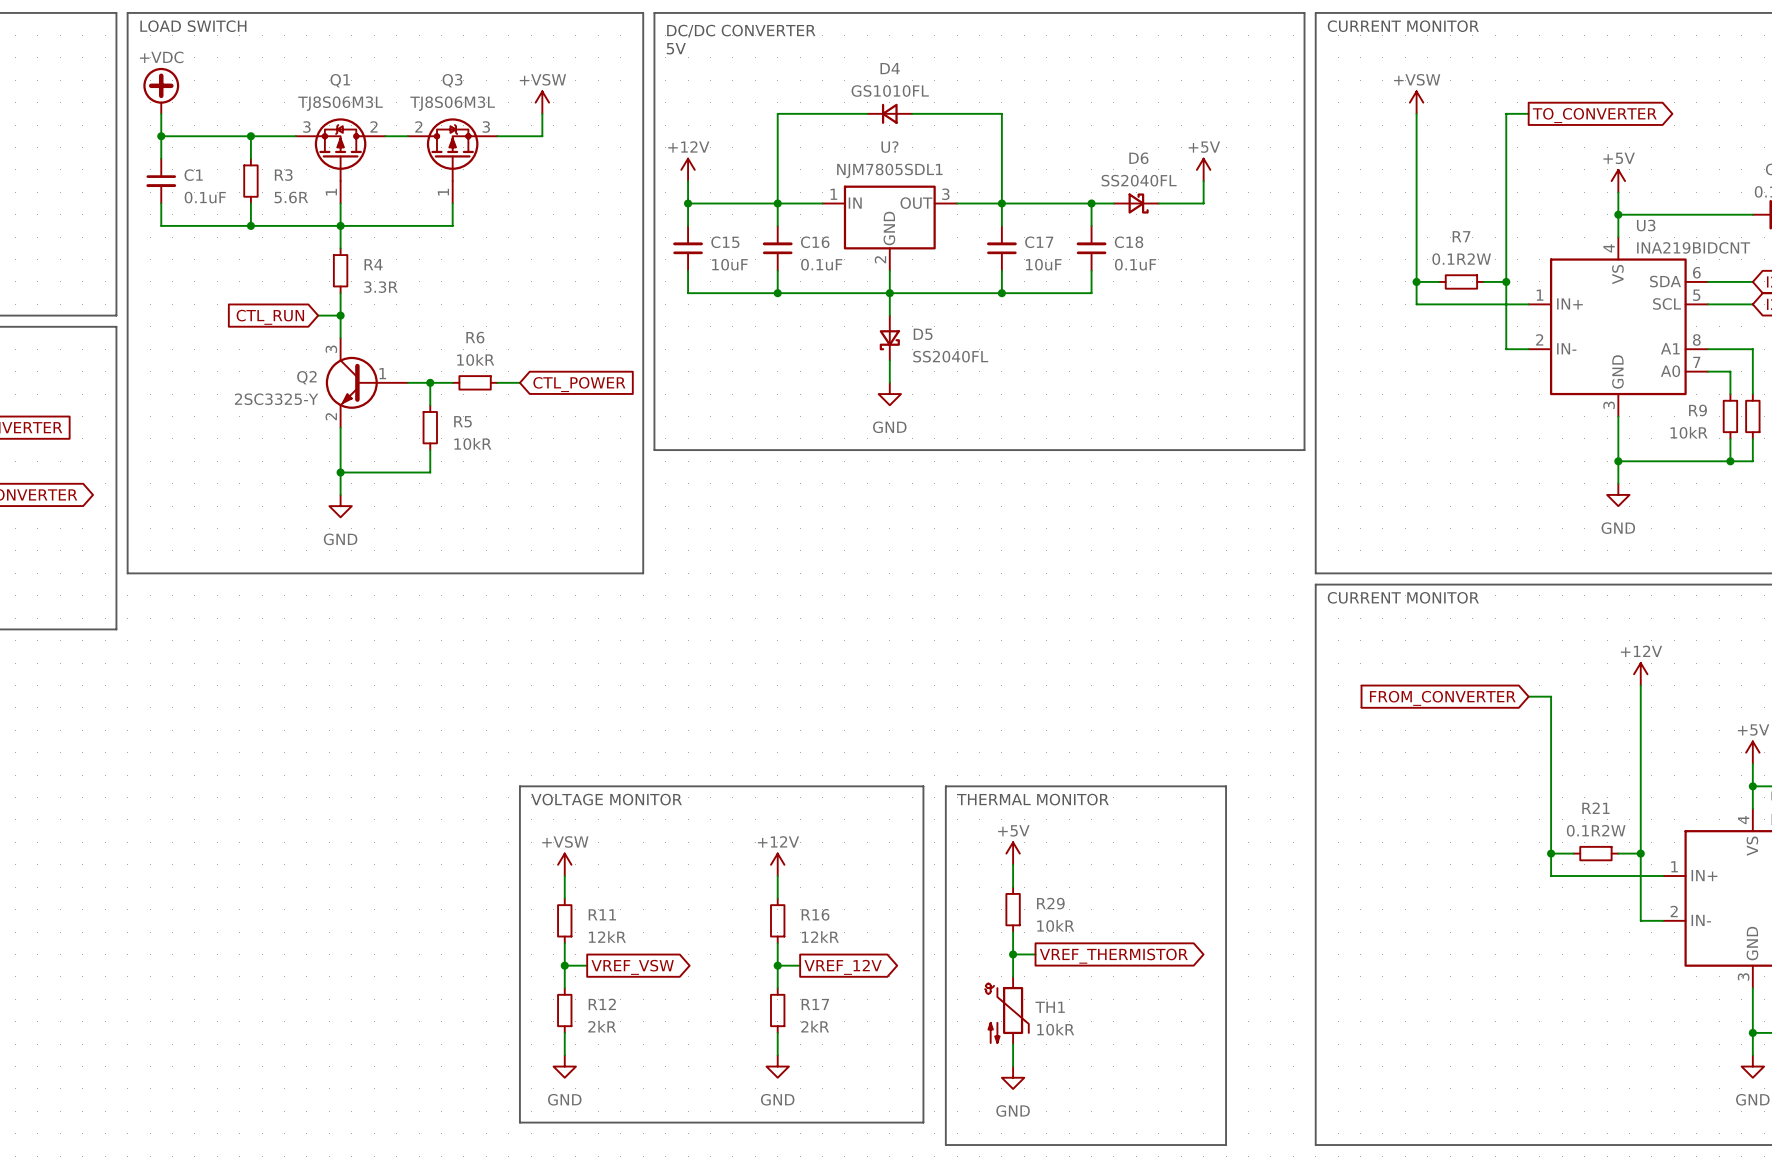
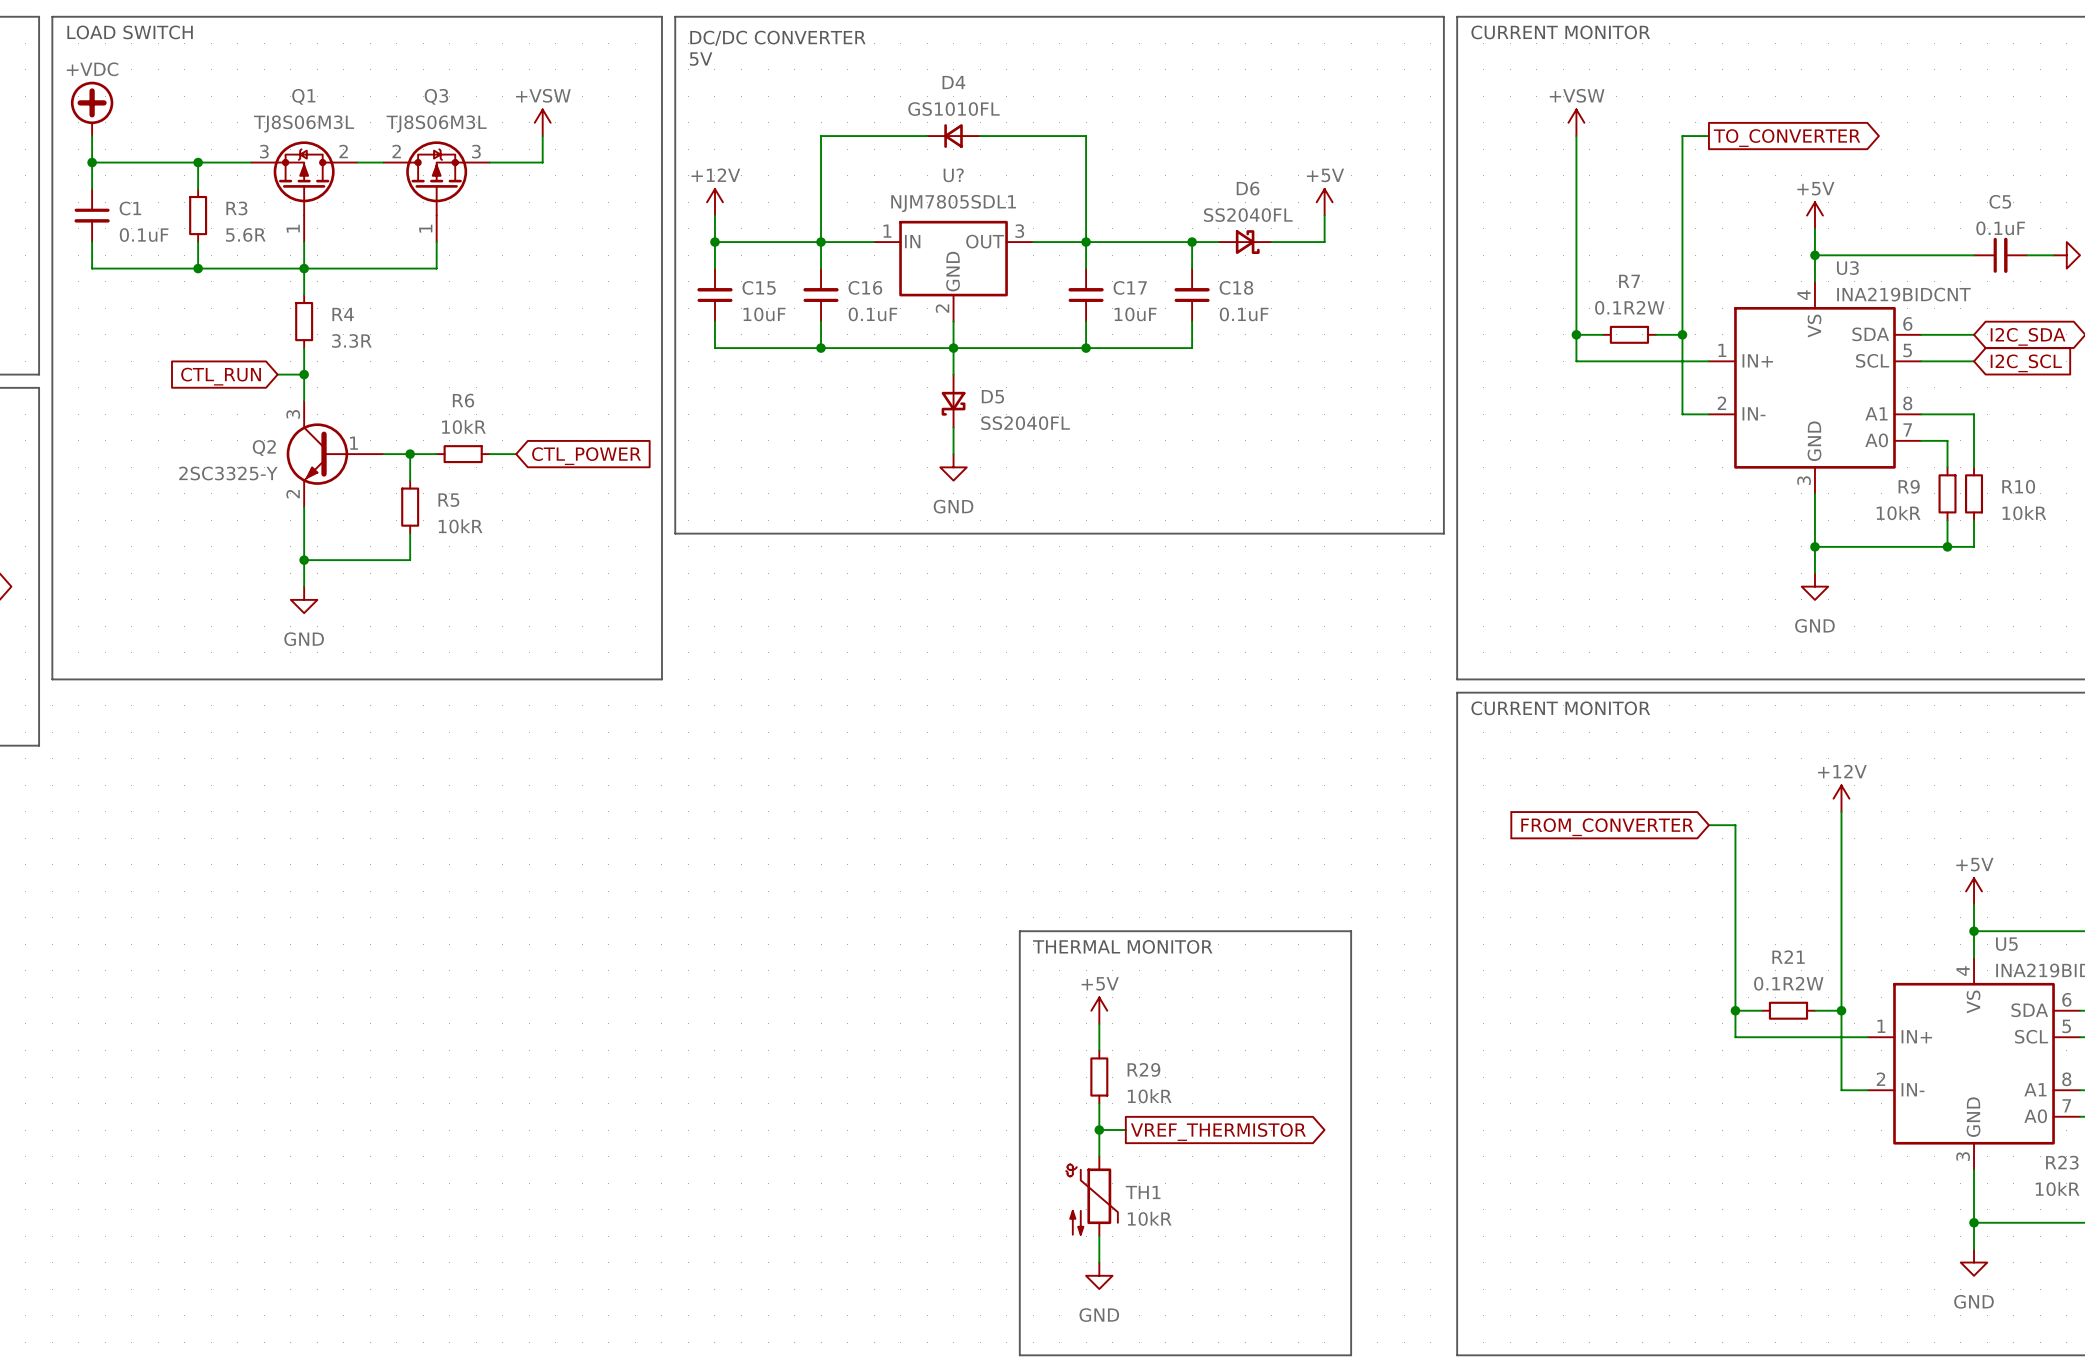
line: (519, 786) (923, 786) (923, 1122) (519, 1122) (519, 786) -> none
text: VOLTAGE MONITOR (606, 799) -> none
power symbol: +VSW (564, 864) -> none
power symbol: +12V (777, 864) -> none
wire: (564, 876) (564, 898) -> none
wire: (777, 876) (777, 898) -> none
R11: 12kR (564, 920) -> none
R16: 12kR (777, 920) -> none
wire: (564, 943) (564, 988) -> none
wire: (777, 943) (777, 988) -> none
wire: (564, 965) (587, 965) -> none
junction: (564, 965) -> none
wire: (777, 965) (800, 965) -> none
junction: (777, 965) -> none
global label: VREF_VSW (632, 967) -> none
global label: VREF_12V (843, 967) -> none
R12: 2kR (564, 1010) -> none
R17: 2kR (777, 1010) -> none
wire: (564, 1032) (564, 1055) -> none
wire: (777, 1032) (777, 1055) -> none
power symbol: GND (564, 1066) -> none
power symbol: GND (777, 1066) -> none

